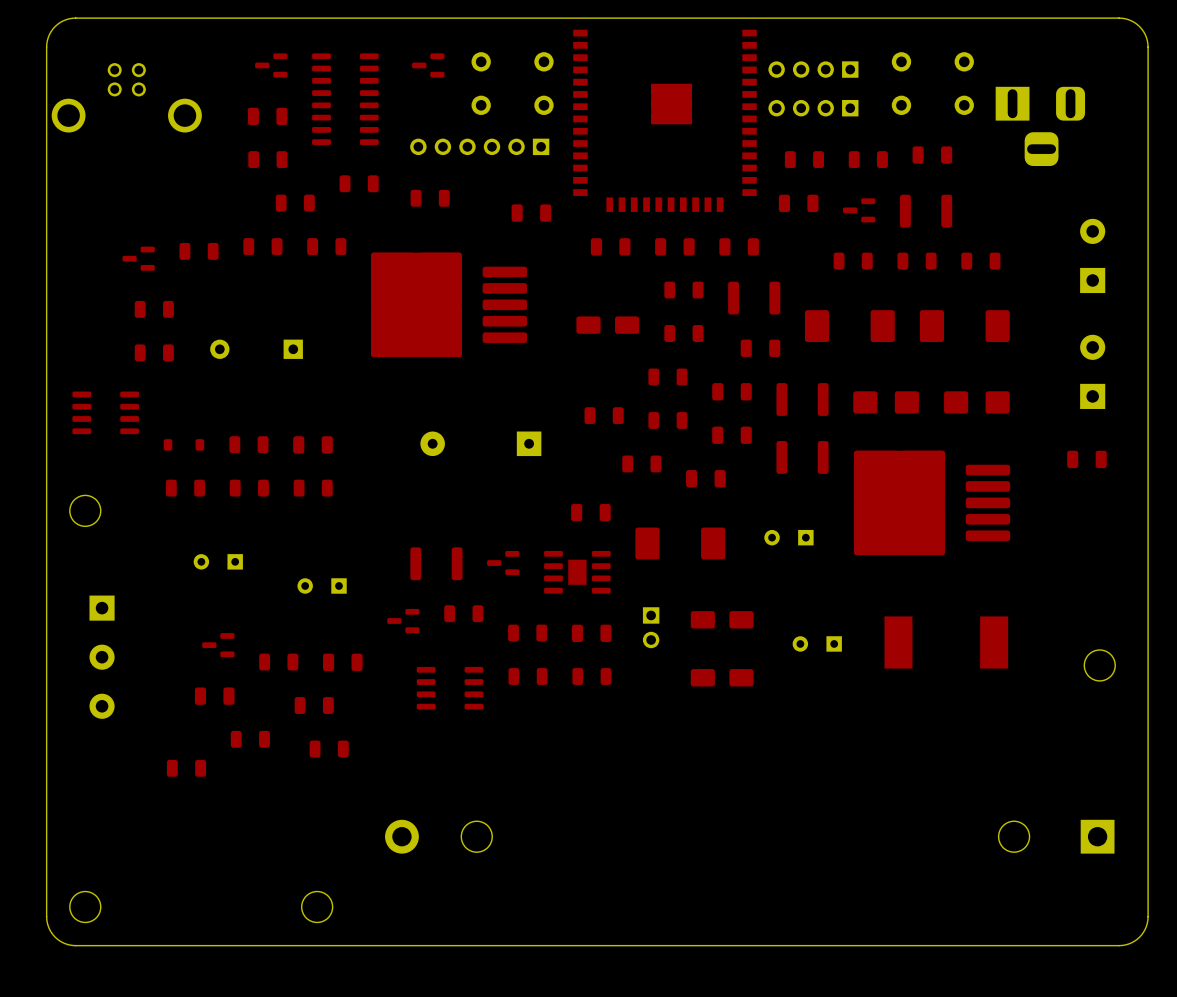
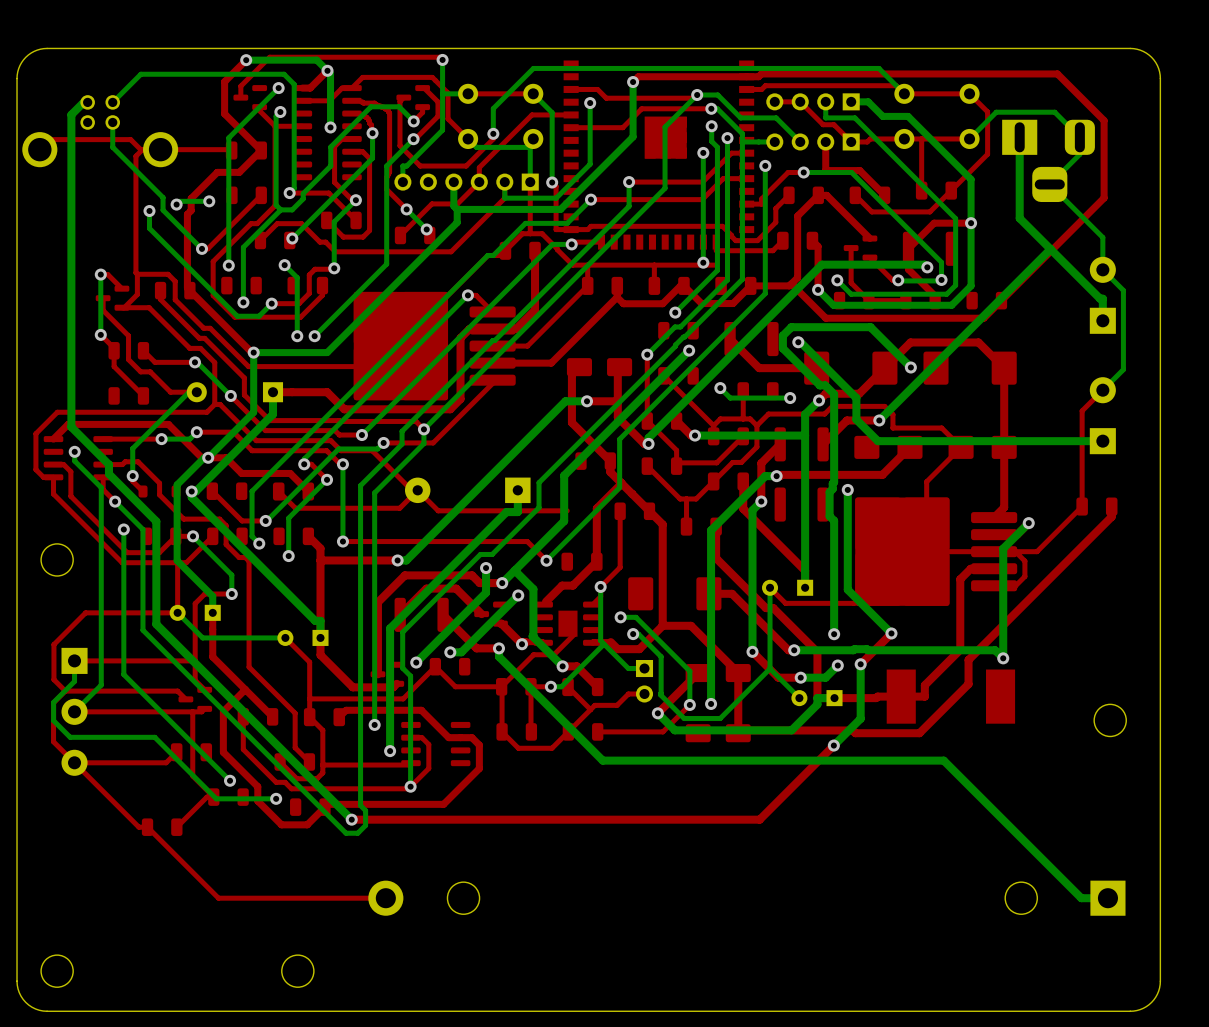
top track: none -> (246, 60) (224, 81) (224, 113) (261, 150) (239, 172) (217, 172) (191, 198) (191, 210) (187, 214) (187, 288) (253, 352)
bottom track: none -> (246, 60) (316, 60) (330, 73) (330, 127)
via: none -> (246, 60)
top track: none -> (442, 59) (439, 57) (269, 57) (240, 86) (240, 97)
bottom track: none -> (442, 59) (442, 130) (406, 166) (402, 166) (402, 182)
via: none -> (442, 59)
top track: none -> (327, 70) (310, 88) (302, 88)
via: none -> (327, 70)
top track: none -> (633, 82) (638, 76) (758, 76) (761, 73) (1057, 73) (1104, 120) (1104, 198) (983, 318) (825, 318) (791, 283)
bottom track: none -> (633, 82) (633, 136) (560, 209) (457, 209)
via: none -> (633, 82)
bottom track: none -> (278, 88) (228, 137) (228, 265)
via: none -> (278, 88)
top track: none -> (422, 88) (437, 101) (437, 116) (413, 139)
top track: none -> (571, 89) (597, 89) (606, 98) (693, 98) (697, 95)
top track: none -> (746, 89) (761, 89) (765, 85) (896, 85) (904, 93) (969, 93) (987, 111) (987, 154) (929, 211) (871, 211) (855, 195)
bottom track: none -> (468, 93) (442, 93)
top track: none -> (533, 93) (468, 93)
bottom track: none -> (533, 93) (552, 112) (552, 182)
bottom track: none -> (904, 93) (878, 68) (533, 68) (493, 108) (493, 133)
via: none -> (697, 95)
top track: none -> (403, 97) (399, 101) (399, 145) (420, 166) (466, 166) (493, 138) (493, 133)
top track: none -> (302, 100) (329, 100) (342, 88) (351, 88) (362, 77) (432, 77) (448, 93) (448, 118) (468, 138)
top track: none -> (361, 102) (374, 103) (386, 109) (389, 113) (389, 172) (386, 177) (386, 189) (406, 209)
top track: none -> (774, 101) (800, 101) (823, 124) (833, 124) (851, 141) (867, 141) (870, 138) (969, 138)
bottom track: none -> (825, 101) (825, 117) (854, 117) (955, 218) (955, 285) (946, 294) (851, 294) (837, 280)
bottom track: none -> (851, 101) (868, 101) (882, 116) (908, 116) (971, 179) (971, 285) (951, 305) (833, 305) (818, 289)
bottom track: none -> (87, 102) (83, 102) (71, 114) (71, 427) (108, 464) (108, 474) (156, 521) (156, 624) (351, 819)
bottom track: none -> (112, 102) (140, 74) (284, 74) (294, 84) (294, 188) (289, 192)
bottom track: none -> (590, 103) (590, 164) (556, 198) (504, 198) (504, 182)
via: none -> (590, 103)
top track: none -> (259, 107) (259, 110) (275, 126)
top track: none -> (422, 107) (422, 112) (413, 121)
top track: none -> (711, 108) (641, 108) (622, 127) (571, 127)
bottom track: none -> (711, 108) (717, 108) (742, 133) (742, 279) (539, 482) (539, 507) (492, 554) (480, 554) (402, 632) (402, 668) (410, 676) (410, 786)
via: none -> (711, 108)
bottom track: none -> (280, 112) (276, 116) (276, 205) (280, 209)
via: none -> (280, 112)
top track: none -> (361, 115) (368, 119) (372, 133)
top track: none -> (571, 114) (531, 114) (479, 167) (479, 182) (457, 203) (431, 203) (400, 235)
bottom track: none -> (413, 121) (399, 106) (371, 106) (330, 147) (330, 166) (303, 193) (303, 198) (292, 209) (280, 209)
via: none -> (413, 121)
bottom track: none -> (112, 122) (112, 147) (163, 197) (163, 210) (201, 248)
top track: none -> (275, 126) (275, 205) (257, 223) (251, 223) (213, 261) (213, 295) (234, 317) (300, 317) (322, 295) (322, 285)
top track: none -> (302, 126) (275, 126)
bottom track: none -> (711, 126) (711, 141) (717, 147) (717, 270) (675, 312)
via: none -> (711, 126)
via: none -> (330, 127)
bottom track: none -> (372, 133) (372, 158) (292, 238)
via: none -> (372, 133)
via: none -> (493, 133)
bottom track: none -> (1019, 137) (1019, 218) (1100, 298) (1102, 298) (1102, 320)
bottom track: none -> (727, 138) (727, 279) (680, 326) (675, 326) (647, 354)
via: none -> (727, 138)
top track: none -> (351, 139) (342, 139) (334, 146) (334, 182) (352, 200) (355, 200)
bottom track: none -> (413, 139) (386, 166) (386, 264) (314, 336)
via: none -> (413, 139)
bottom track: none -> (468, 138) (476, 147) (530, 147)
bottom track: none -> (533, 138) (530, 141) (530, 182)
top track: none -> (921, 138) (921, 190)
bottom track: none -> (969, 138) (996, 112) (1054, 112) (1079, 137) (1079, 154) (1049, 184) (1102, 237) (1102, 269) (1123, 290) (1123, 369) (1102, 390)
bottom track: none -> (774, 141) (742, 141)
bottom track: none -> (800, 141) (776, 117) (740, 117) (717, 95) (697, 95) (665, 127) (665, 188) (423, 429) (423, 443) (374, 492) (374, 724)
top track: none -> (825, 141) (825, 170) (859, 170) (884, 195)
top track: none -> (39, 149) (49, 139) (130, 139) (141, 150)
top track: none -> (231, 150) (142, 149) (135, 156) (137, 274)
top track: none -> (351, 151) (362, 151) (369, 158) (369, 230) (363, 237) (343, 237) (326, 220)
bottom track: none -> (703, 152) (703, 262)
via: none -> (703, 152)
top track: none -> (746, 153) (731, 153) (702, 182) (629, 182)
bottom track: none -> (765, 165) (765, 293) (619, 439) (619, 487) (546, 560)
via: none -> (765, 165)
top track: none -> (803, 172) (788, 172) (761, 198) (761, 204) (746, 204)
bottom track: none -> (803, 172) (851, 172) (941, 262) (940, 280) (898, 280)
via: none -> (803, 172)
top track: none -> (746, 178) (723, 178) (702, 199) (590, 199)
bottom track: none -> (453, 182) (453, 206) (457, 209)
top track: none -> (504, 182) (504, 198) (451, 251) (335, 251) (325, 242) (320, 242) (301, 223) (277, 223) (260, 240)
top track: none -> (530, 182) (530, 233)
bottom track: none -> (629, 182) (629, 206) (402, 431) (402, 444) (360, 485) (360, 805) (365, 810) (365, 825) (357, 833) (346, 833) (142, 630) (142, 529) (115, 501)
via: none -> (629, 182)
top track: none -> (552, 182) (556, 186) (556, 229) (587, 229) (591, 226) (722, 226) (735, 240) (757, 240) (775, 222) (775, 208) (789, 195)
via: none -> (552, 182)
top track: none -> (289, 193) (328, 193) (356, 220)
via: none -> (289, 193)
top track: none -> (261, 195) (207, 248) (201, 248)
bottom track: none -> (590, 199) (567, 223) (525, 223) (493, 255) (487, 255) (252, 491) (252, 536) (259, 543)
via: none -> (590, 199)
bottom track: none -> (355, 200) (334, 221) (334, 268)
via: none -> (355, 200)
bottom track: none -> (209, 201) (179, 201) (176, 204)
via: none -> (209, 201)
via: none -> (176, 204)
bottom track: none -> (280, 209) (243, 247) (243, 302)
bottom track: none -> (406, 209) (426, 229)
via: none -> (406, 209)
bottom track: none -> (457, 209) (457, 222) (327, 352) (253, 352) (253, 412) (208, 457) (204, 457) (177, 484) (177, 560) (212, 596) (212, 612)
bottom track: none -> (149, 210) (149, 228) (237, 316) (259, 316) (271, 303)
via: none -> (149, 210)
top track: none -> (971, 223) (934, 223) (908, 248) (908, 269) (935, 296) (935, 300)
via: none -> (971, 223)
via: none -> (426, 229)
via: none -> (292, 238)
top track: none -> (869, 238) (826, 195) (818, 195) (797, 216) (797, 277) (789, 285) (750, 285) (733, 303) (701, 303) (683, 285) (680, 285) (662, 303) (623, 303) (617, 297)
top track: none -> (782, 240) (772, 250) (716, 250)
top track: none -> (812, 240) (818, 246) (818, 289)
top track: none -> (601, 242) (573, 242) (571, 244)
bottom track: none -> (571, 244) (552, 244) (361, 435)
via: none -> (571, 244)
top track: none -> (851, 248) (851, 282) (868, 300) (905, 300)
via: none -> (201, 248)
bottom track: none -> (1050, 249) (879, 420)
top track: none -> (535, 250) (535, 310) (516, 329) (469, 329) (460, 338) (460, 399) (450, 409) (344, 409) (327, 392) (273, 392)
top track: none -> (869, 257) (892, 280) (898, 280)
via: none -> (703, 262)
bottom track: none -> (284, 265) (297, 277) (297, 336)
via: none -> (284, 265)
top track: none -> (587, 265) (587, 285) (527, 346) (492, 346)
top track: none -> (654, 265) (654, 285)
top track: none -> (716, 265) (572, 265) (542, 233) (522, 233) (500, 255) (487, 255) (425, 318) (376, 318)
via: none -> (228, 265)
bottom track: none -> (927, 267) (924, 264) (821, 264) (648, 438) (648, 443)
via: none -> (927, 267)
top track: none -> (334, 268) (315, 269) (309, 274) (309, 293) (299, 303) (271, 303)
via: none -> (334, 268)
top track: none -> (100, 274) (107, 274) (121, 288)
bottom track: none -> (100, 274) (100, 334)
via: none -> (100, 274)
top track: none -> (137, 274) (137, 294) (124, 307)
top track: none -> (137, 274) (168, 274) (175, 281) (175, 299) (203, 328) (210, 328) (248, 366) (380, 366) (400, 346)
via: none -> (837, 280)
via: none -> (898, 280)
via: none -> (941, 279)
via: none -> (818, 289)
top track: none -> (160, 290) (160, 299) (199, 338) (204, 338) (244, 377) (244, 395) (269, 420) (416, 421) (423, 429)
top track: none -> (467, 295) (476, 295) (492, 311)
bottom track: none -> (467, 295) (304, 459) (304, 464)
via: none -> (467, 295)
top track: none -> (617, 297) (551, 363) (492, 363)
top track: none -> (103, 298) (103, 310) (128, 335) (128, 359) (140, 371) (150, 371) (170, 392) (196, 392)
via: none -> (243, 302)
via: none -> (271, 303)
top track: none -> (121, 307) (149, 307) (189, 348) (200, 348) (214, 362) (214, 404)
via: none -> (675, 312)
top track: none -> (100, 334) (114, 348) (114, 366) (143, 395)
via: none -> (100, 334)
via: none -> (297, 336)
via: none -> (314, 336)
top track: none -> (730, 339) (759, 368) (816, 368)
bottom track: none -> (798, 342) (800, 342) (856, 398) (856, 419) (877, 441) (1102, 441)
via: none -> (798, 342)
top track: none -> (143, 350) (155, 362) (194, 362)
bottom track: none -> (689, 350) (564, 475) (564, 521) (502, 583)
via: none -> (689, 350)
via: none -> (253, 352)
top track: none -> (647, 354) (647, 421) (676, 450) (676, 466) (679, 462) (716, 462) (743, 436)
via: none -> (647, 354)
bottom track: none -> (194, 362) (197, 362) (230, 395)
via: none -> (194, 362)
top track: none -> (579, 367) (571, 374) (571, 422) (610, 461) (610, 472) (662, 524) (662, 625)
top track: none -> (619, 367) (617, 368) (617, 417) (644, 443) (648, 443)
bottom track: none -> (910, 367) (870, 327) (791, 327) (782, 335) (782, 348) (819, 385) (825, 385) (834, 394) (834, 482) (832, 489) (829, 492) (829, 516) (834, 520) (834, 634)
via: none -> (910, 367)
top track: none -> (663, 375) (713, 425)
top track: none -> (492, 380) (492, 383) (433, 442) (383, 442)
bottom track: none -> (720, 388) (730, 398) (790, 398)
via: none -> (720, 388)
top track: none -> (1102, 390) (1082, 410) (1082, 506) (1037, 551) (902, 551)
top track: none -> (743, 391) (743, 418)
bottom track: none -> (196, 392) (189, 392) (132, 448) (132, 476)
bottom track: none -> (273, 392) (273, 414) (195, 491) (191, 491) (191, 497) (315, 620) (320, 620) (320, 637)
top track: none -> (230, 395) (265, 430) (335, 430) (339, 435) (361, 435)
via: none -> (230, 395)
via: none -> (790, 398)
top track: none -> (819, 400) (825, 393) (859, 393) (910, 342) (978, 342) (1004, 368) (1004, 507) (994, 517)
bottom track: none -> (819, 400) (805, 414) (805, 587)
via: none -> (819, 400)
bottom track: none -> (586, 401) (565, 401) (406, 560) (397, 560)
via: none -> (586, 401)
top track: none -> (617, 401) (586, 401)
top track: none -> (214, 404) (220, 404) (256, 440) (330, 440) (340, 450) (372, 450) (411, 490) (417, 490)
top track: none -> (214, 404) (206, 412) (57, 412) (35, 433) (35, 469) (43, 477) (53, 477) (53, 494) (122, 562) (186, 562) (212, 536)
top track: none -> (879, 420) (846, 420) (823, 444)
via: none -> (879, 420)
top track: none -> (676, 421) (691, 435) (695, 435)
top track: none -> (756, 425) (750, 418) (720, 418) (713, 425)
top track: none -> (756, 425) (756, 446) (741, 462) (732, 462) (696, 498) (680, 498) (647, 466)
top track: none -> (756, 425) (768, 414) (824, 414) (832, 406) (884, 406) (892, 414) (892, 428) (941, 428) (961, 447) (926, 481) (926, 523) (878, 523)
via: none -> (423, 429)
top track: none -> (196, 432) (233, 432) (252, 450) (326, 450) (340, 464) (342, 464)
bottom track: none -> (196, 432) (189, 439) (161, 439)
via: none -> (196, 432)
via: none -> (361, 435)
via: none -> (695, 435)
bottom track: none -> (805, 435) (695, 435)
top track: none -> (53, 439) (68, 424) (168, 424) (201, 457) (226, 457) (241, 473) (290, 473) (308, 491)
top track: none -> (161, 439) (103, 439)
via: none -> (161, 439)
bottom track: none -> (383, 442) (377, 448) (338, 448) (265, 520)
via: none -> (383, 442)
via: none -> (648, 443)
top track: none -> (780, 444) (761, 463) (761, 501)
top track: none -> (909, 447) (882, 474) (776, 476)
bottom track: none -> (74, 451) (74, 461) (101, 487) (101, 685) (74, 711)
via: none -> (74, 451)
top track: none -> (103, 451) (103, 464) (122, 464) (125, 461) (138, 461) (159, 483) (159, 494) (183, 519) (219, 519) (226, 525) (226, 544) (239, 557) (245, 557) (249, 561) (249, 667) (295, 713) (295, 747) (309, 762)
via: none -> (208, 457)
top track: none -> (53, 464) (63, 464) (70, 471) (70, 496) (127, 552) (159, 552) (175, 536) (193, 536)
top track: none -> (304, 464) (311, 464) (327, 479)
via: none -> (304, 464)
bottom track: none -> (342, 464) (342, 541)
via: none -> (342, 464)
top track: none -> (132, 476) (132, 481) (143, 491)
via: none -> (132, 476)
bottom track: none -> (776, 476) (765, 476) (711, 530) (711, 703)
via: none -> (776, 476)
top track: none -> (103, 477) (103, 489) (115, 501)
bottom track: none -> (327, 479) (288, 518) (288, 556)
via: none -> (327, 479)
top track: none -> (743, 481) (743, 508) (805, 570) (805, 587)
top track: none -> (621, 483) (596, 508) (596, 561) (572, 585) (562, 585) (546, 601)
top track: none -> (417, 490) (438, 510) (567, 510)
top track: none -> (417, 490) (399, 508) (295, 508) (278, 491)
bottom track: none -> (517, 490) (517, 512) (506, 512) (390, 628) (390, 751)
bottom track: none -> (847, 489) (847, 589) (891, 633)
via: none -> (847, 489)
via: none -> (191, 491)
top track: none -> (212, 491) (242, 520) (265, 520)
top track: none -> (686, 498) (686, 526)
via: none -> (115, 501)
bottom track: none -> (761, 501) (752, 510) (752, 651)
via: none -> (761, 501)
top track: none -> (1111, 506) (1111, 516) (968, 660) (968, 684) (919, 733) (855, 733) (852, 730) (741, 730) (738, 733) (738, 673) (691, 625) (662, 625)
top track: none -> (620, 511) (620, 567) (600, 586) (600, 596) (592, 604)
via: none -> (265, 520)
bottom track: none -> (1028, 523) (1003, 548) (1003, 658) (995, 650) (794, 650)
via: none -> (1028, 523)
top track: none -> (716, 526) (716, 558) (765, 608) (773, 608) (817, 652) (817, 698) (924, 696) (924, 685) (960, 649) (960, 579) (970, 568) (994, 568)
bottom track: none -> (123, 529) (123, 674) (230, 780)
via: none -> (123, 529)
bottom track: none -> (193, 536) (231, 575) (231, 594)
via: none -> (193, 536)
top track: none -> (308, 536) (320, 548) (320, 655) (352, 687) (393, 687) (396, 683)
top track: none -> (342, 541) (527, 541) (546, 560)
via: none -> (342, 541)
via: none -> (259, 543)
top track: none -> (1015, 551) (1024, 561) (1024, 576) (1015, 585) (994, 585)
via: none -> (288, 556)
top track: none -> (397, 560) (320, 560)
via: none -> (397, 560)
via: none -> (546, 560)
top track: none -> (177, 562) (177, 612) (85, 612) (53, 644) (53, 679) (65, 691)
bottom track: none -> (486, 568) (486, 592) (416, 662)
via: none -> (486, 568)
bottom track: none -> (514, 570) (533, 589) (532, 636) (562, 666)
top track: none -> (926, 579) (878, 579) (854, 603) (785, 603) (770, 587)
top track: none -> (502, 583) (479, 583) (472, 575) (404, 575) (377, 602) (377, 674)
via: none -> (502, 583)
bottom track: none -> (600, 586) (600, 640) (628, 668) (644, 668)
via: none -> (600, 586)
bottom track: none -> (770, 587) (770, 668)
top track: none -> (231, 594) (204, 594) (195, 603) (195, 680) (204, 689)
via: none -> (231, 594)
top track: none -> (708, 593) (732, 593) (788, 650) (794, 650)
bottom track: none -> (518, 595) (461, 652) (450, 652)
via: none -> (518, 595)
bottom track: none -> (177, 612) (202, 637) (285, 637)
top track: none -> (212, 612) (212, 656) (272, 716)
top track: none -> (443, 614) (476, 648) (498, 648)
top track: none -> (481, 614) (456, 588) (426, 588) (400, 614)
bottom track: none -> (620, 617) (635, 617) (689, 671) (689, 704)
via: none -> (620, 617)
top track: none -> (500, 623) (521, 644) (524, 642) (543, 642)
top track: none -> (567, 623) (574, 630) (574, 634) (553, 654) (533, 654) (501, 686)
top track: none -> (662, 625) (639, 649) (617, 649) (610, 642) (592, 642)
top track: none -> (891, 633) (860, 664)
via: none -> (891, 633)
bottom track: none -> (633, 634) (638, 634) (661, 656) (660, 694) (684, 718) (720, 718) (770, 668)
via: none -> (633, 634)
via: none -> (834, 634)
top track: none -> (285, 637) (309, 662) (309, 717) (322, 730) (322, 772) (316, 778) (296, 778) (280, 762)
bottom track: none -> (604, 644) (561, 686) (550, 686)
via: none -> (521, 644)
bottom track: none -> (498, 648) (498, 656) (602, 760) (943, 760) (1081, 898) (1107, 898)
via: none -> (498, 648)
via: none -> (794, 650)
via: none -> (450, 652)
top track: none -> (752, 651) (778, 677) (800, 677)
via: none -> (752, 651)
via: none -> (1003, 658)
bottom track: none -> (74, 660) (74, 681) (53, 702) (53, 720) (70, 737) (154, 737) (216, 798) (276, 798)
top track: none -> (195, 660) (74, 660)
via: none -> (416, 662)
bottom track: none -> (860, 664) (860, 718) (833, 745)
via: none -> (860, 664)
bottom track: none -> (837, 665) (825, 677) (800, 677)
via: none -> (837, 665)
top track: none -> (562, 666) (576, 666) (597, 687)
via: none -> (562, 666)
bottom track: none -> (770, 668) (799, 698)
top track: none -> (698, 673) (657, 713)
via: none -> (800, 677)
top track: none -> (501, 686) (502, 731) (518, 748) (552, 748) (590, 709)
top track: none -> (501, 686) (455, 686) (435, 666) (403, 698) (309, 698)
top track: none -> (550, 686) (530, 686) (531, 731)
via: none -> (550, 686)
top track: none -> (568, 687) (590, 709)
top track: none -> (245, 689) (223, 711) (223, 752) (257, 786) (257, 801) (281, 824) (307, 824) (327, 804) (443, 804) (479, 768) (479, 745) (471, 737) (448, 737) (421, 710) (346, 710) (339, 717)
top track: none -> (65, 691) (53, 702) (53, 741) (138, 827) (147, 827) (218, 898) (385, 898)
top track: none -> (65, 691) (177, 691) (185, 699)
top track: none -> (644, 694) (628, 694) (617, 705) (594, 705) (590, 709)
bottom track: none -> (834, 698) (817, 698) (817, 704) (791, 730) (674, 730) (657, 713)
via: none -> (711, 703)
top track: none -> (689, 704) (662, 731) (597, 731)
via: none -> (689, 704)
top track: none -> (204, 708) (201, 711) (74, 711)
top track: none -> (192, 711) (192, 776) (213, 797) (206, 797) (176, 827)
via: none -> (657, 713)
top track: none -> (243, 716) (243, 749) (276, 782) (285, 782) (291, 788) (408, 788) (428, 768) (428, 744) (421, 737) (410, 737)
via: none -> (374, 724)
top track: none -> (833, 745) (759, 819) (351, 819)
via: none -> (833, 745)
via: none -> (390, 751)
top track: none -> (176, 752) (166, 762) (74, 762)
top track: none -> (410, 763) (409, 765) (322, 765)
via: none -> (230, 780)
via: none -> (410, 786)
via: none -> (276, 798)
via: none -> (351, 819)

